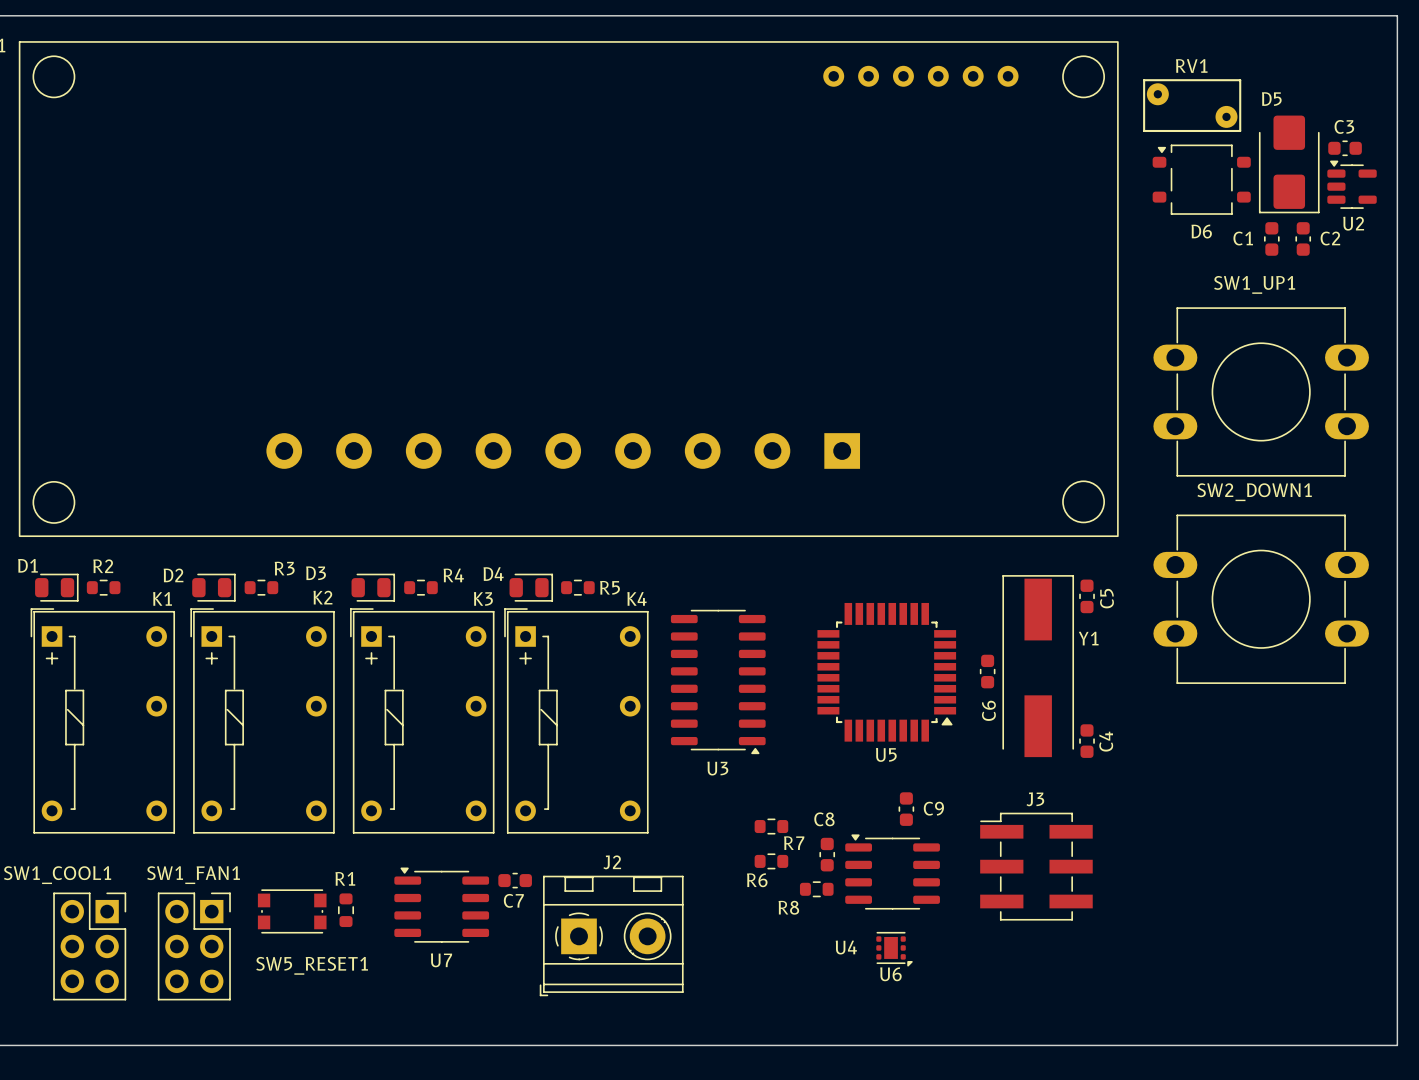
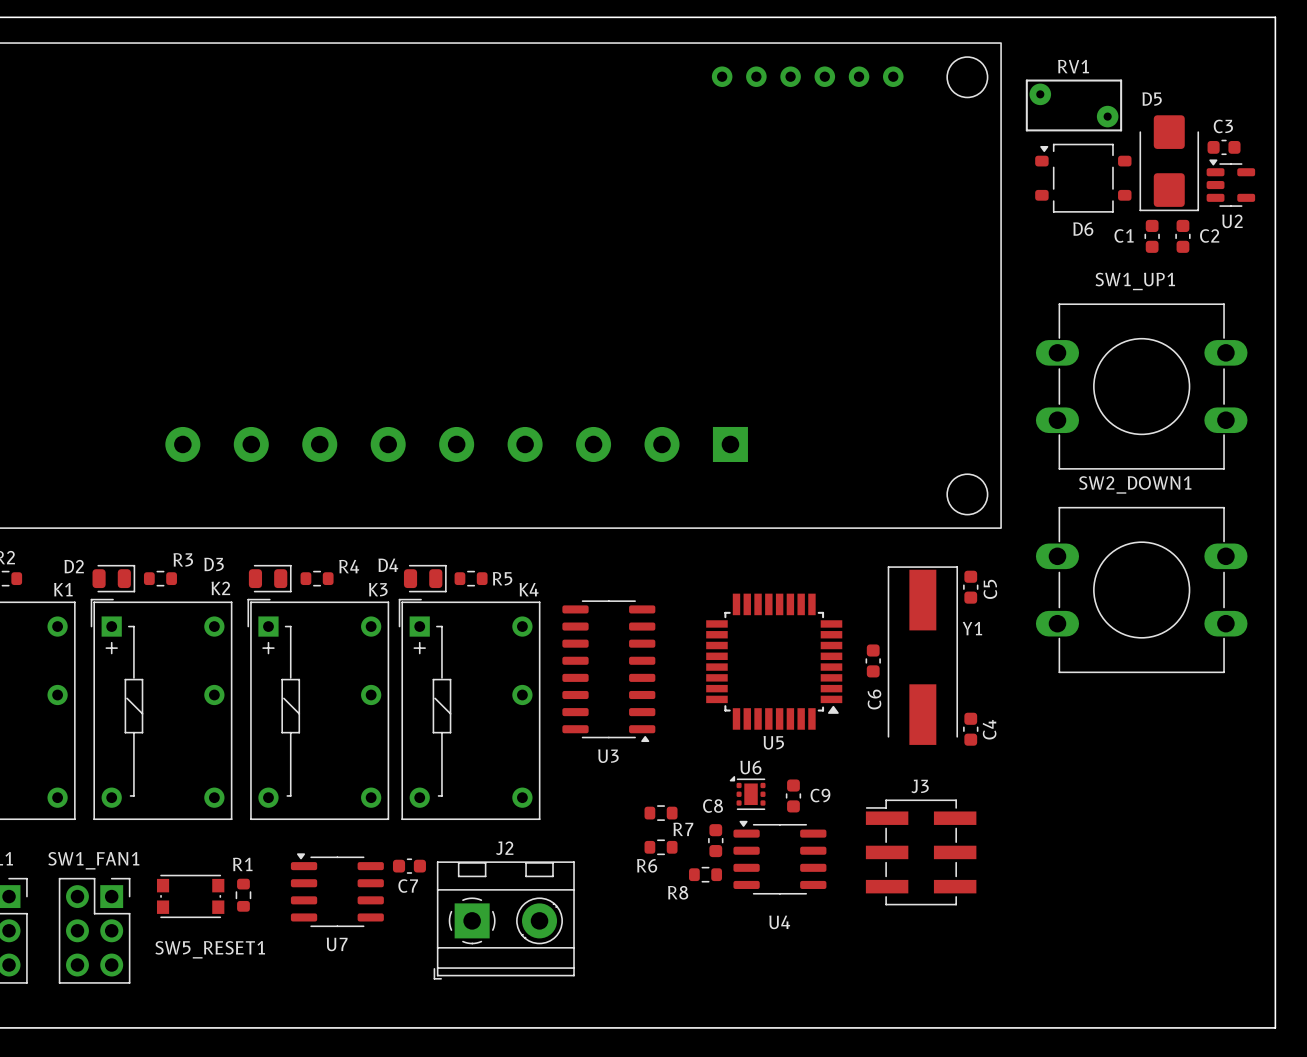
U4 name position: U4 (846, 947) -> U4 (779, 922)
U6 rotation: 0° (894, 949) -> 180° (747, 793)
U6 position: (894, 949) -> (747, 793)

